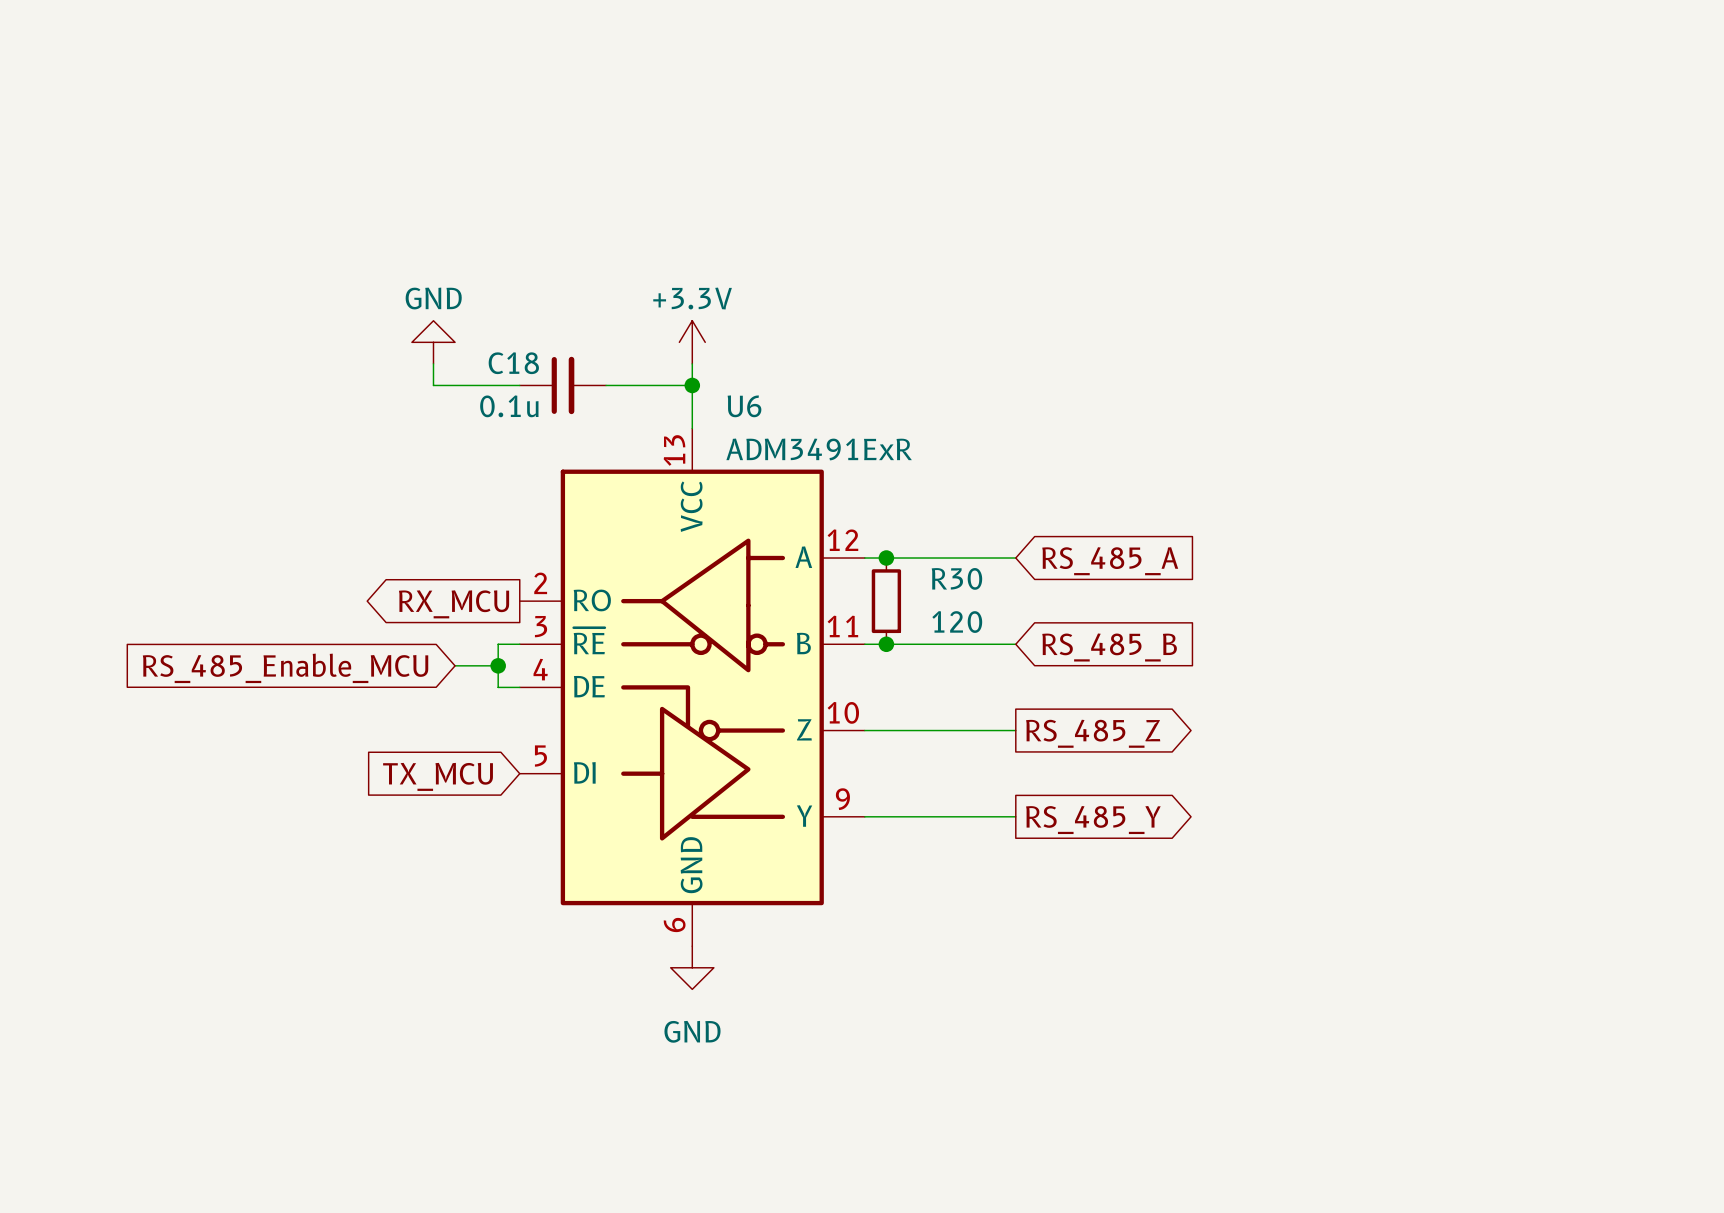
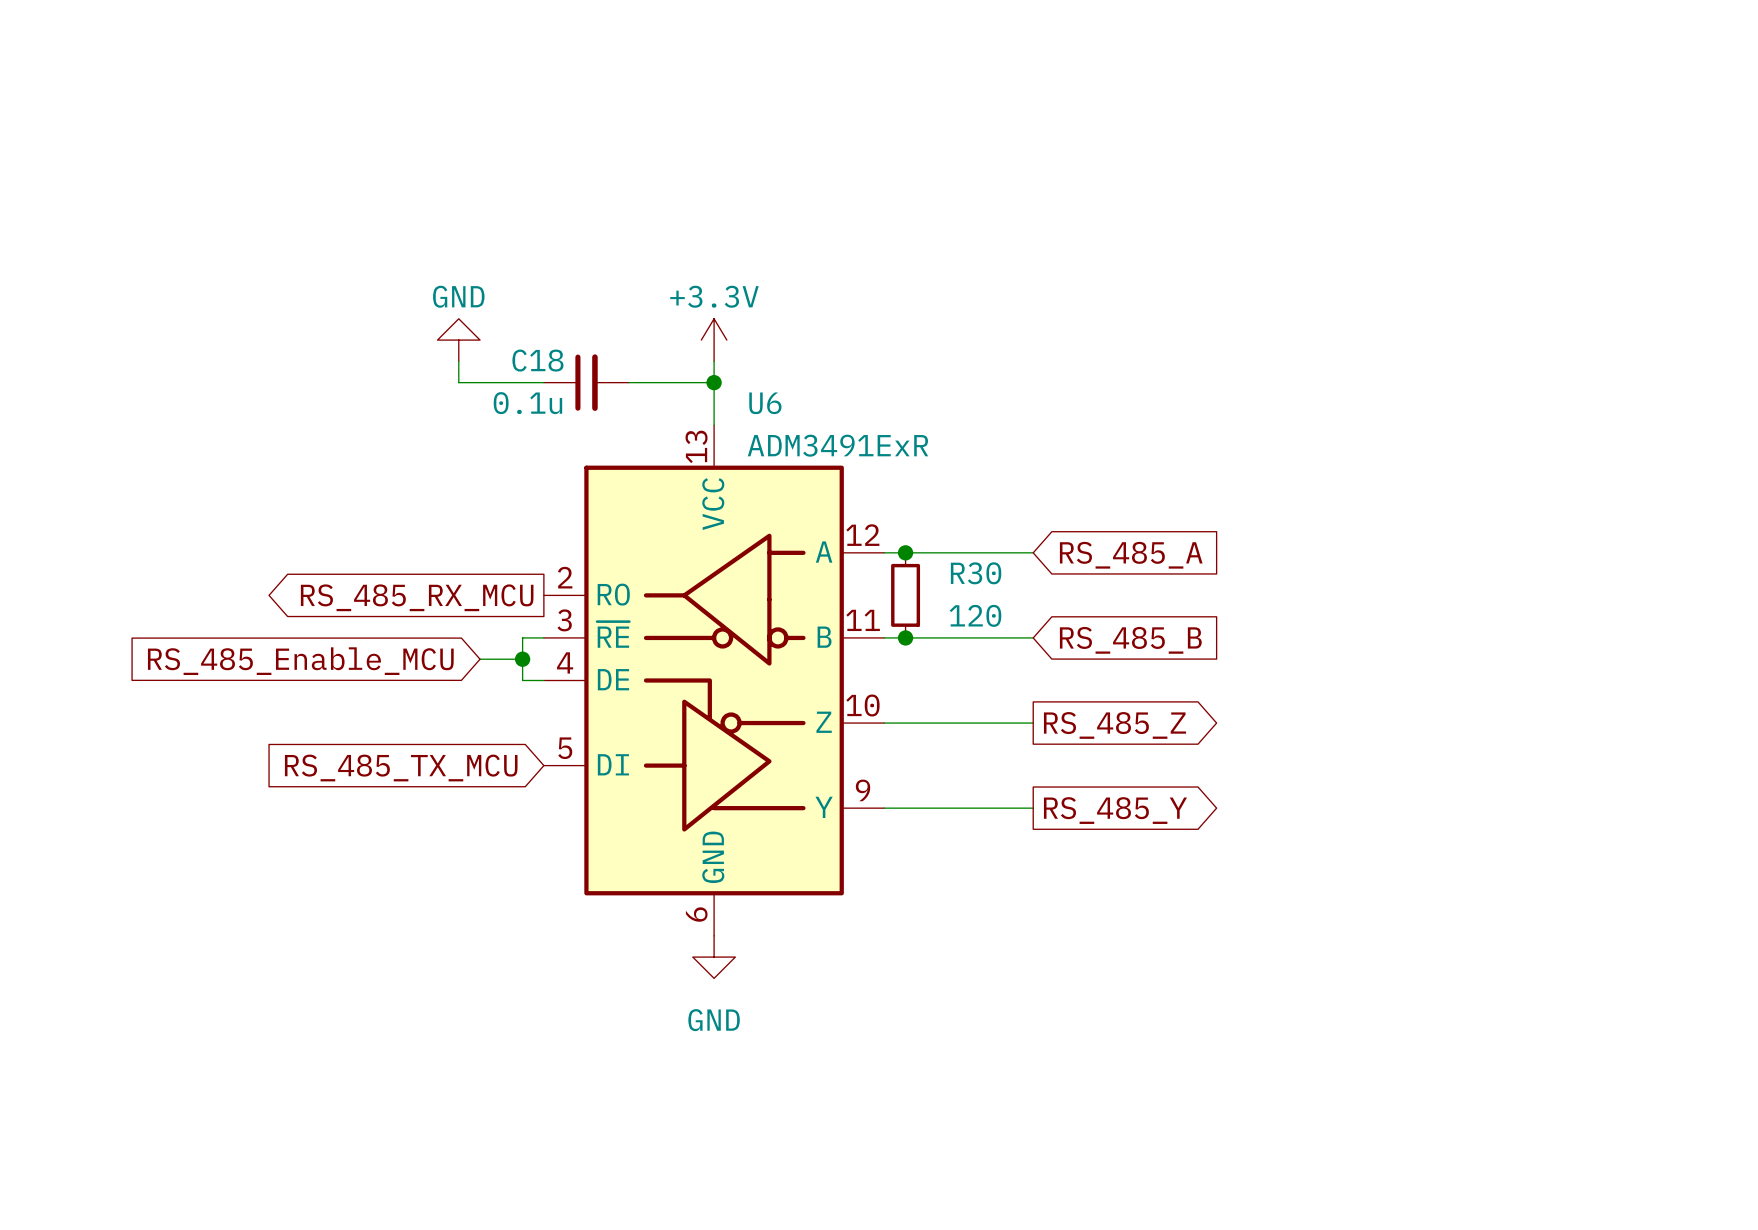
global label: RX_MCU (454, 604) -> RS_485_RX_MCU (417, 597)
global label: TX_MCU (438, 776) -> RS_485_TX_MCU (401, 767)

